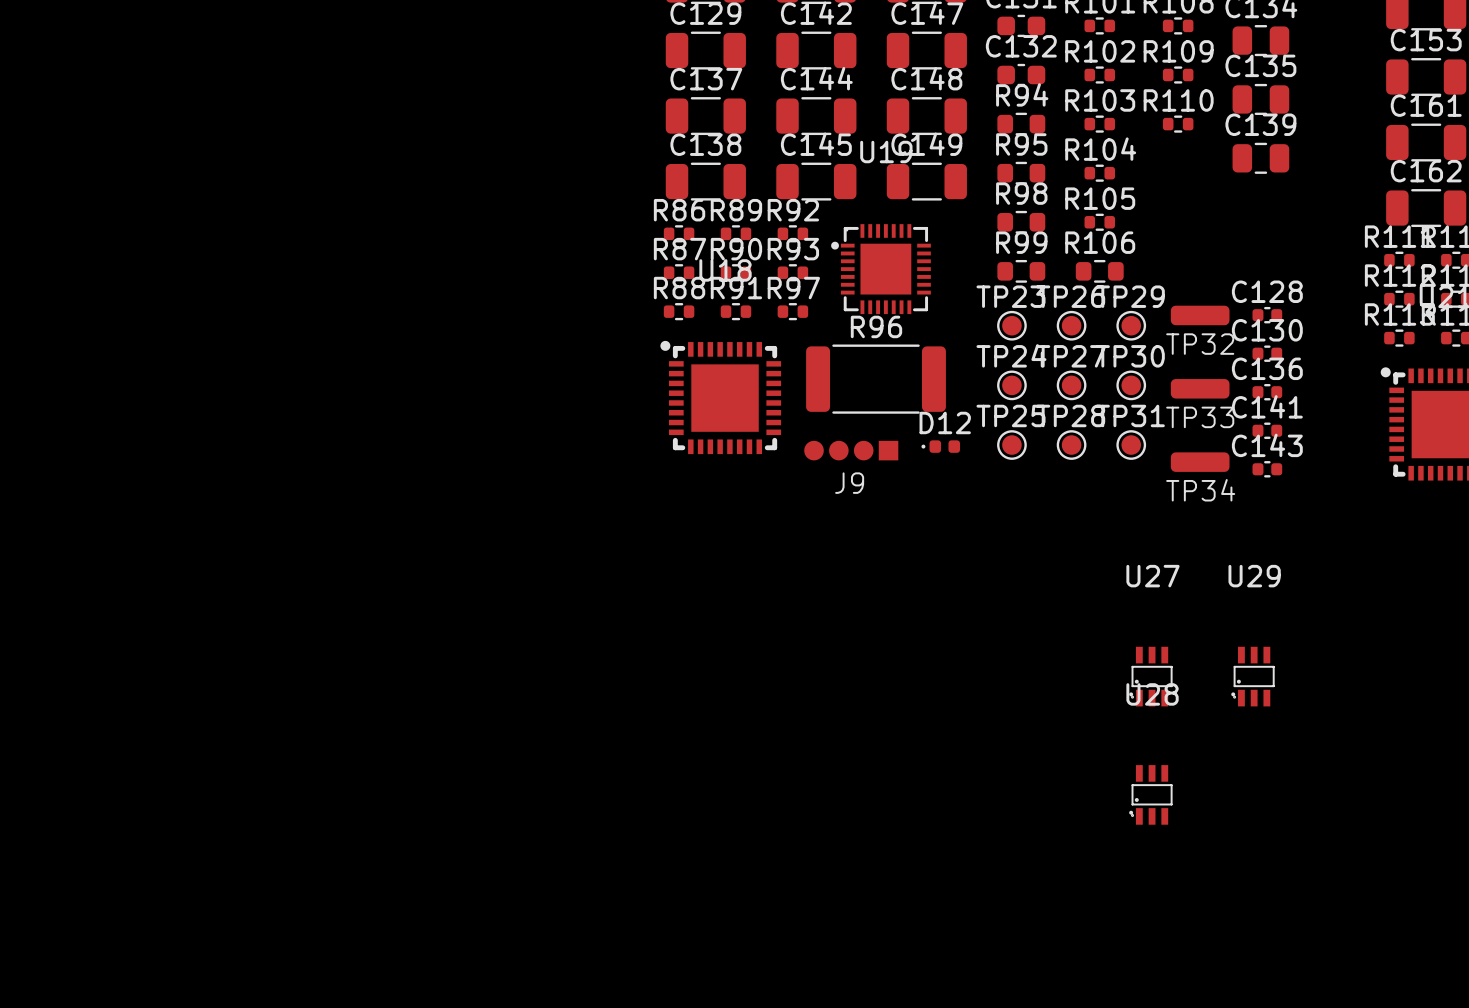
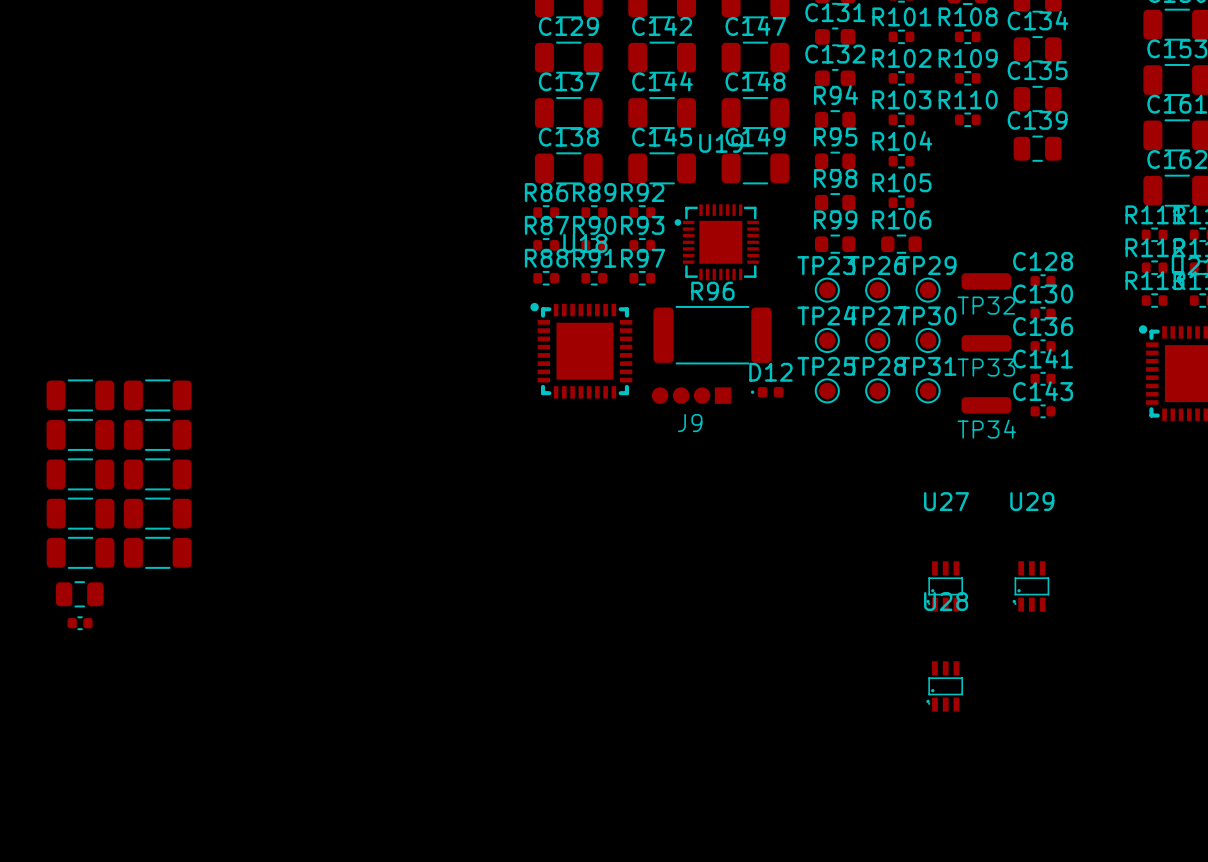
part: none -> (80, 395)
part: none -> (157, 395)
part: none -> (80, 434)
part: none -> (157, 434)
part: none -> (80, 474)
part: none -> (157, 474)
part: none -> (80, 513)
part: none -> (157, 513)
part: none -> (80, 552)
part: none -> (157, 552)
part: none -> (79, 594)
part: none -> (80, 623)

